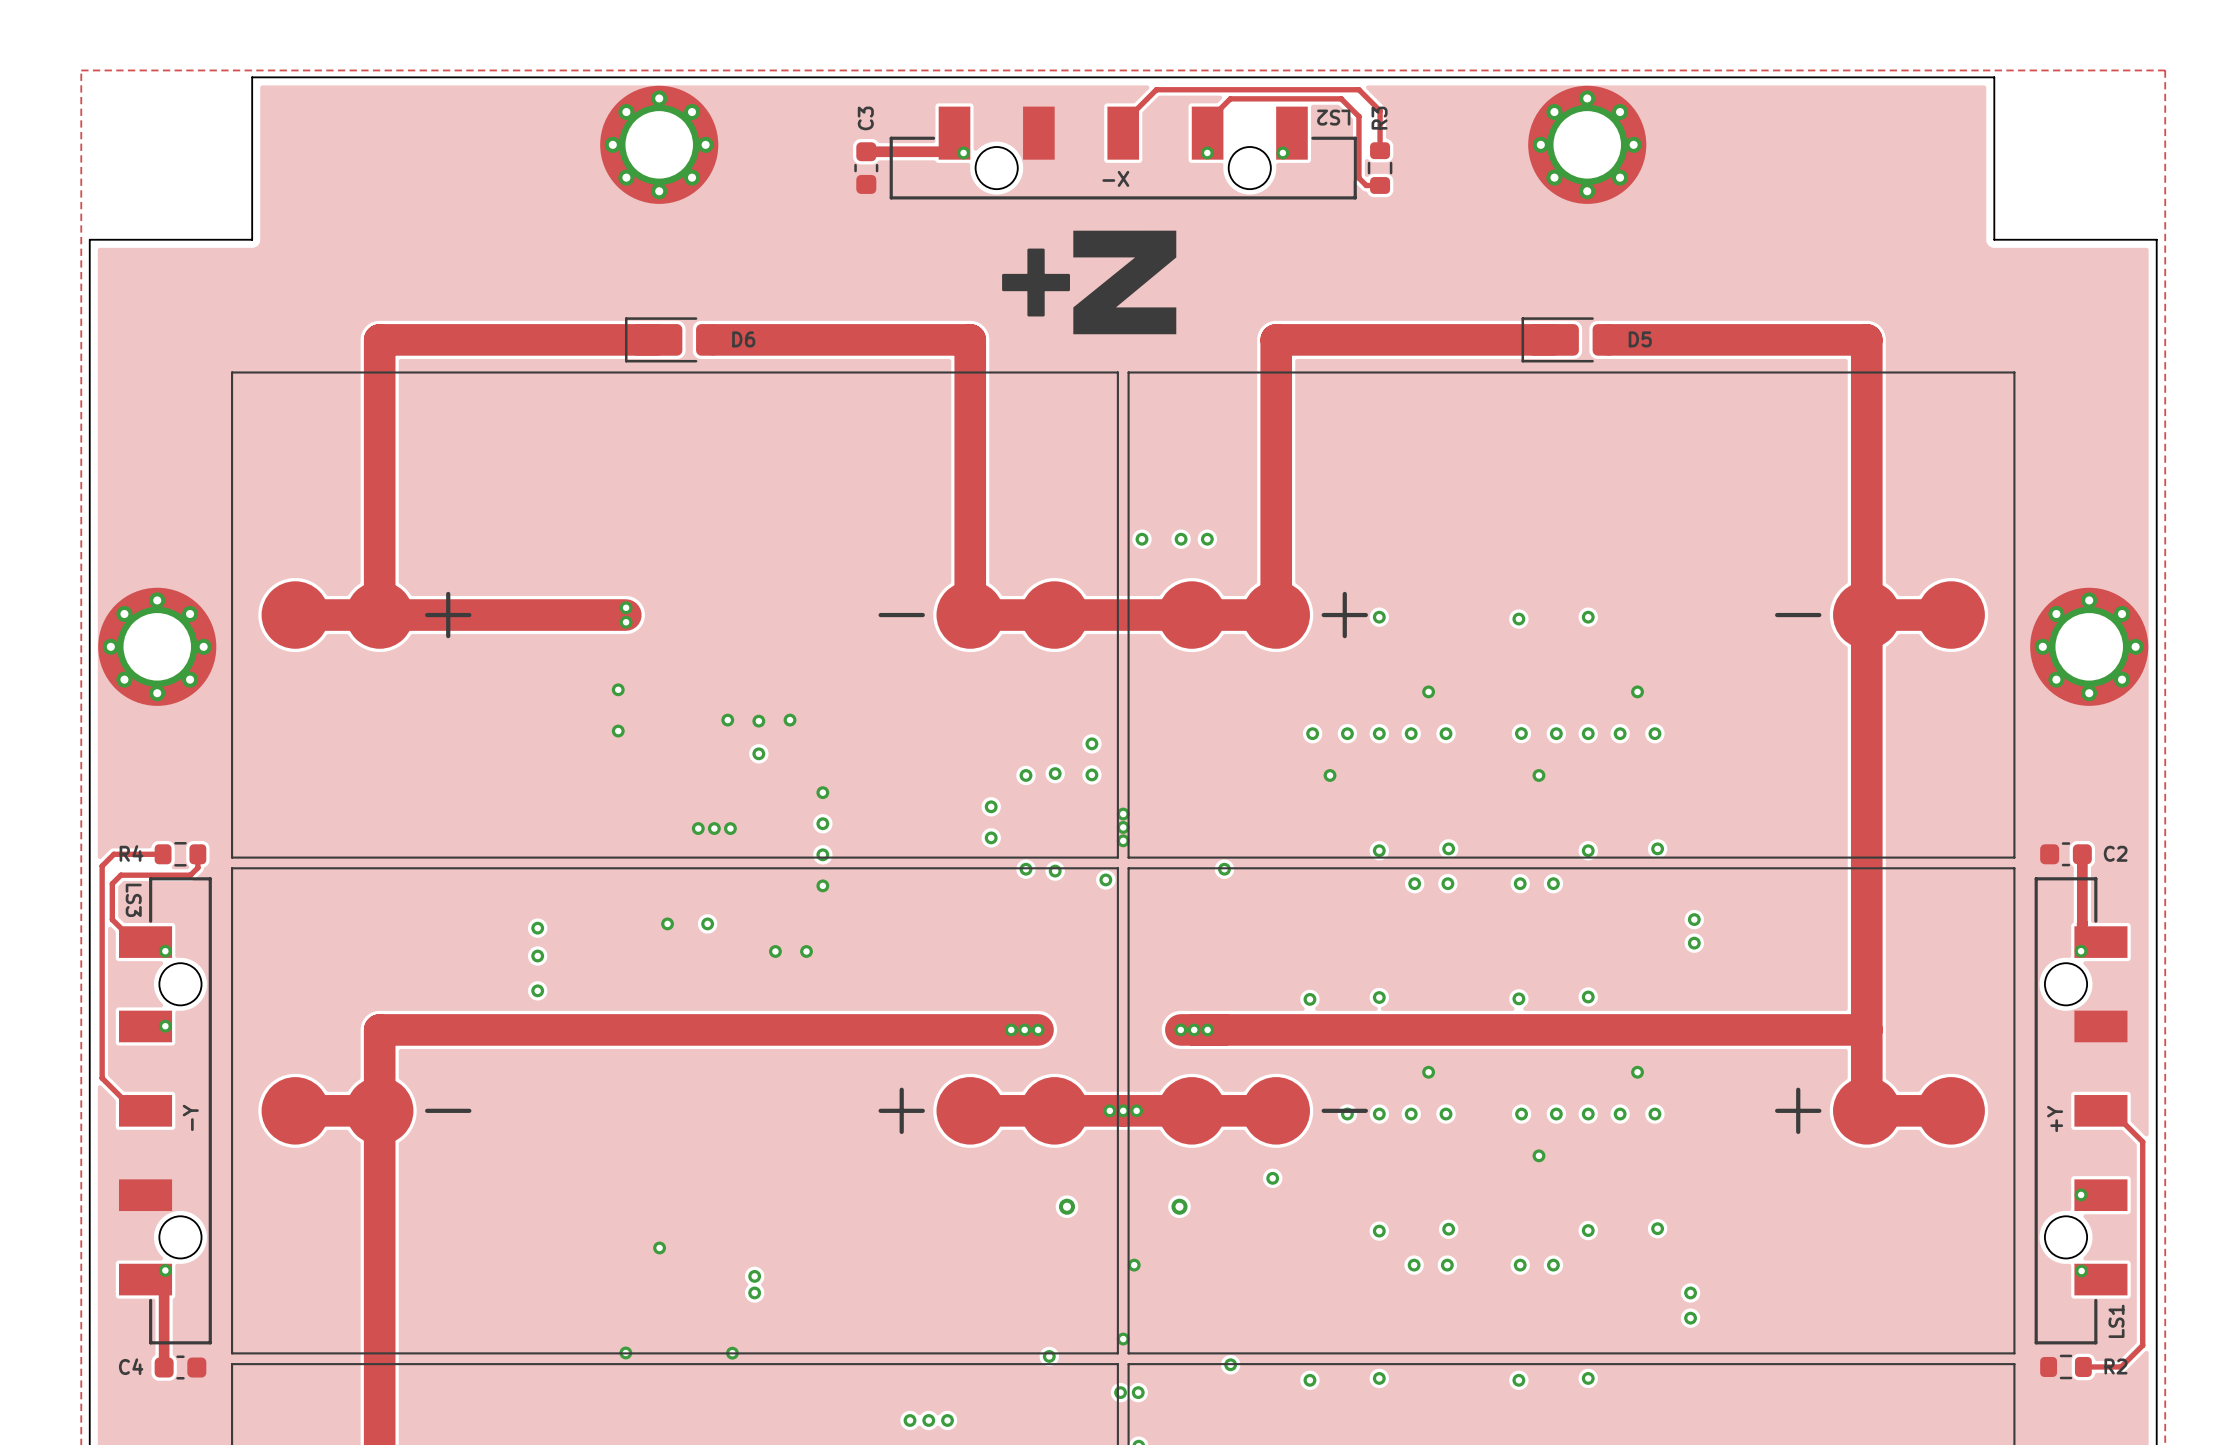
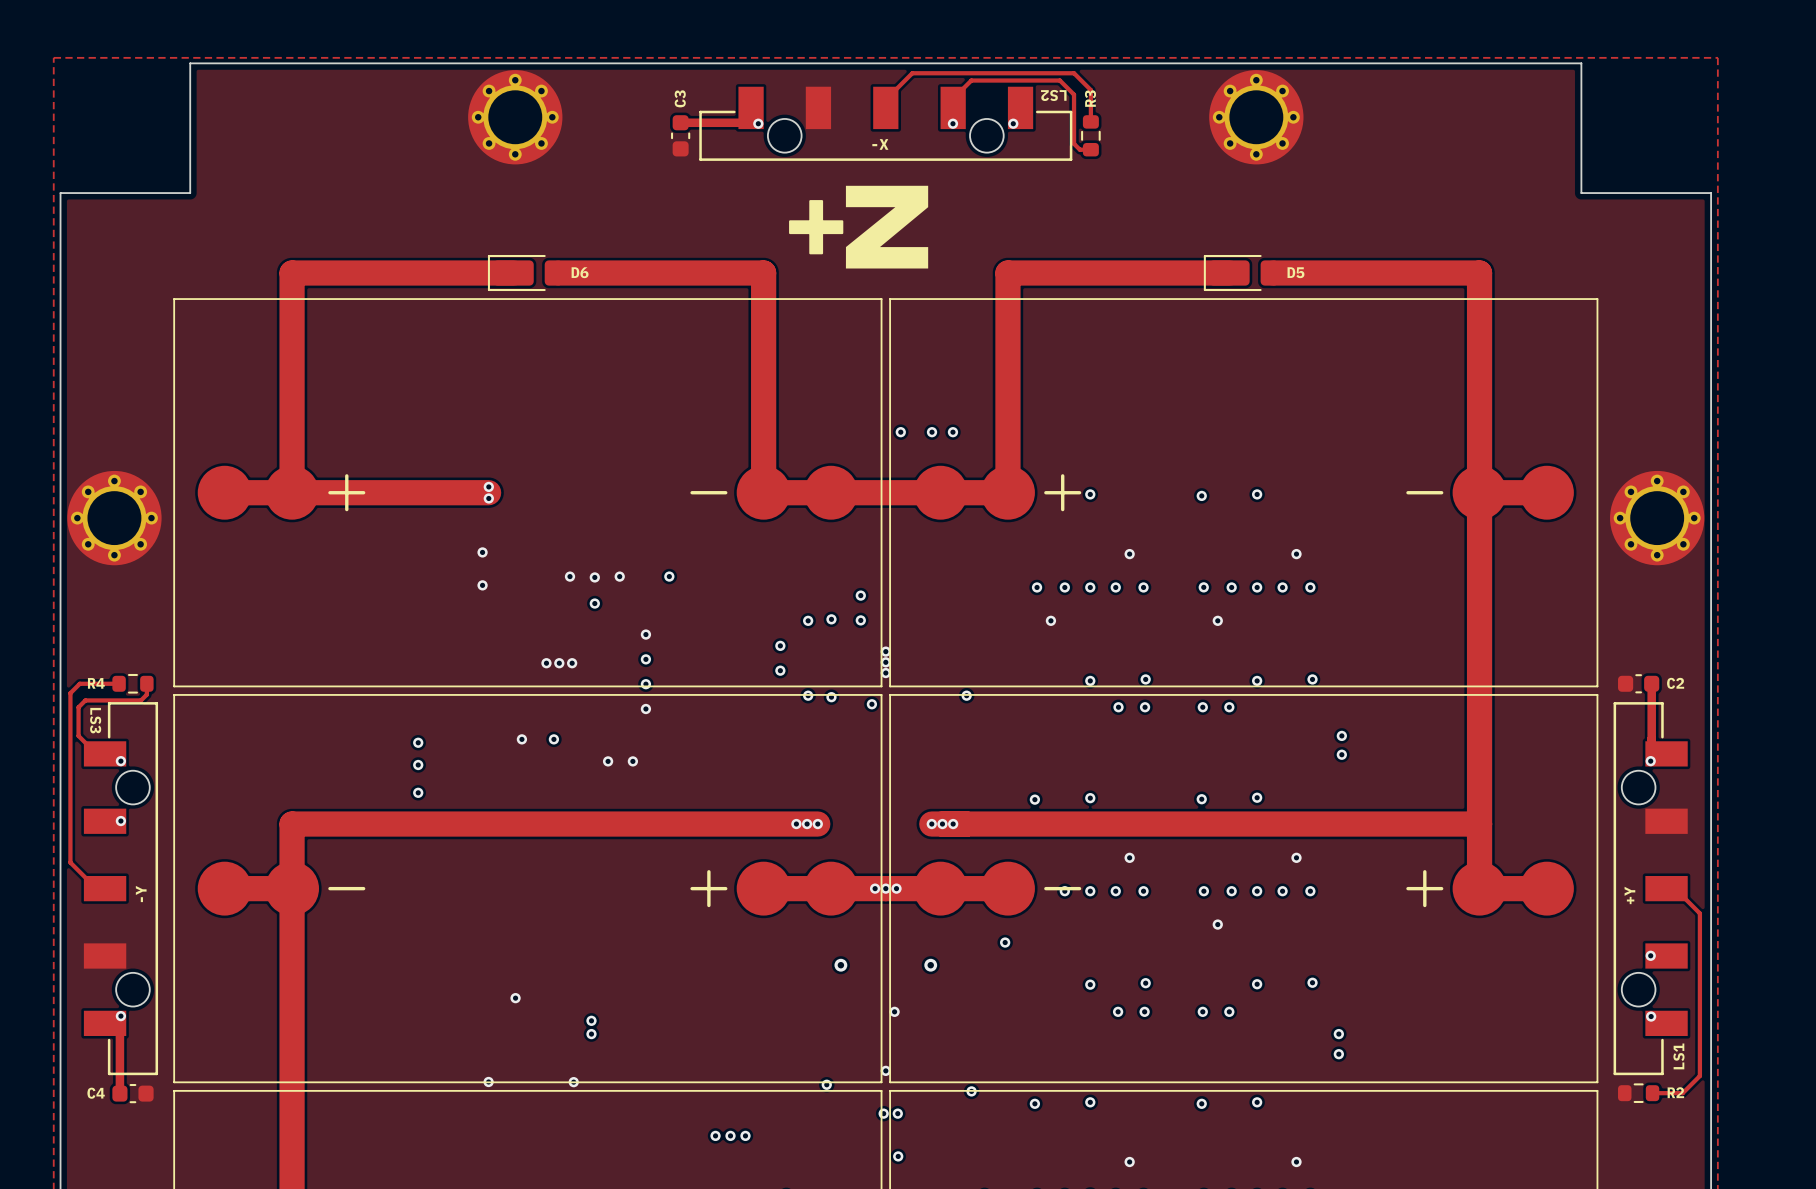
via: none -> (669, 576)

